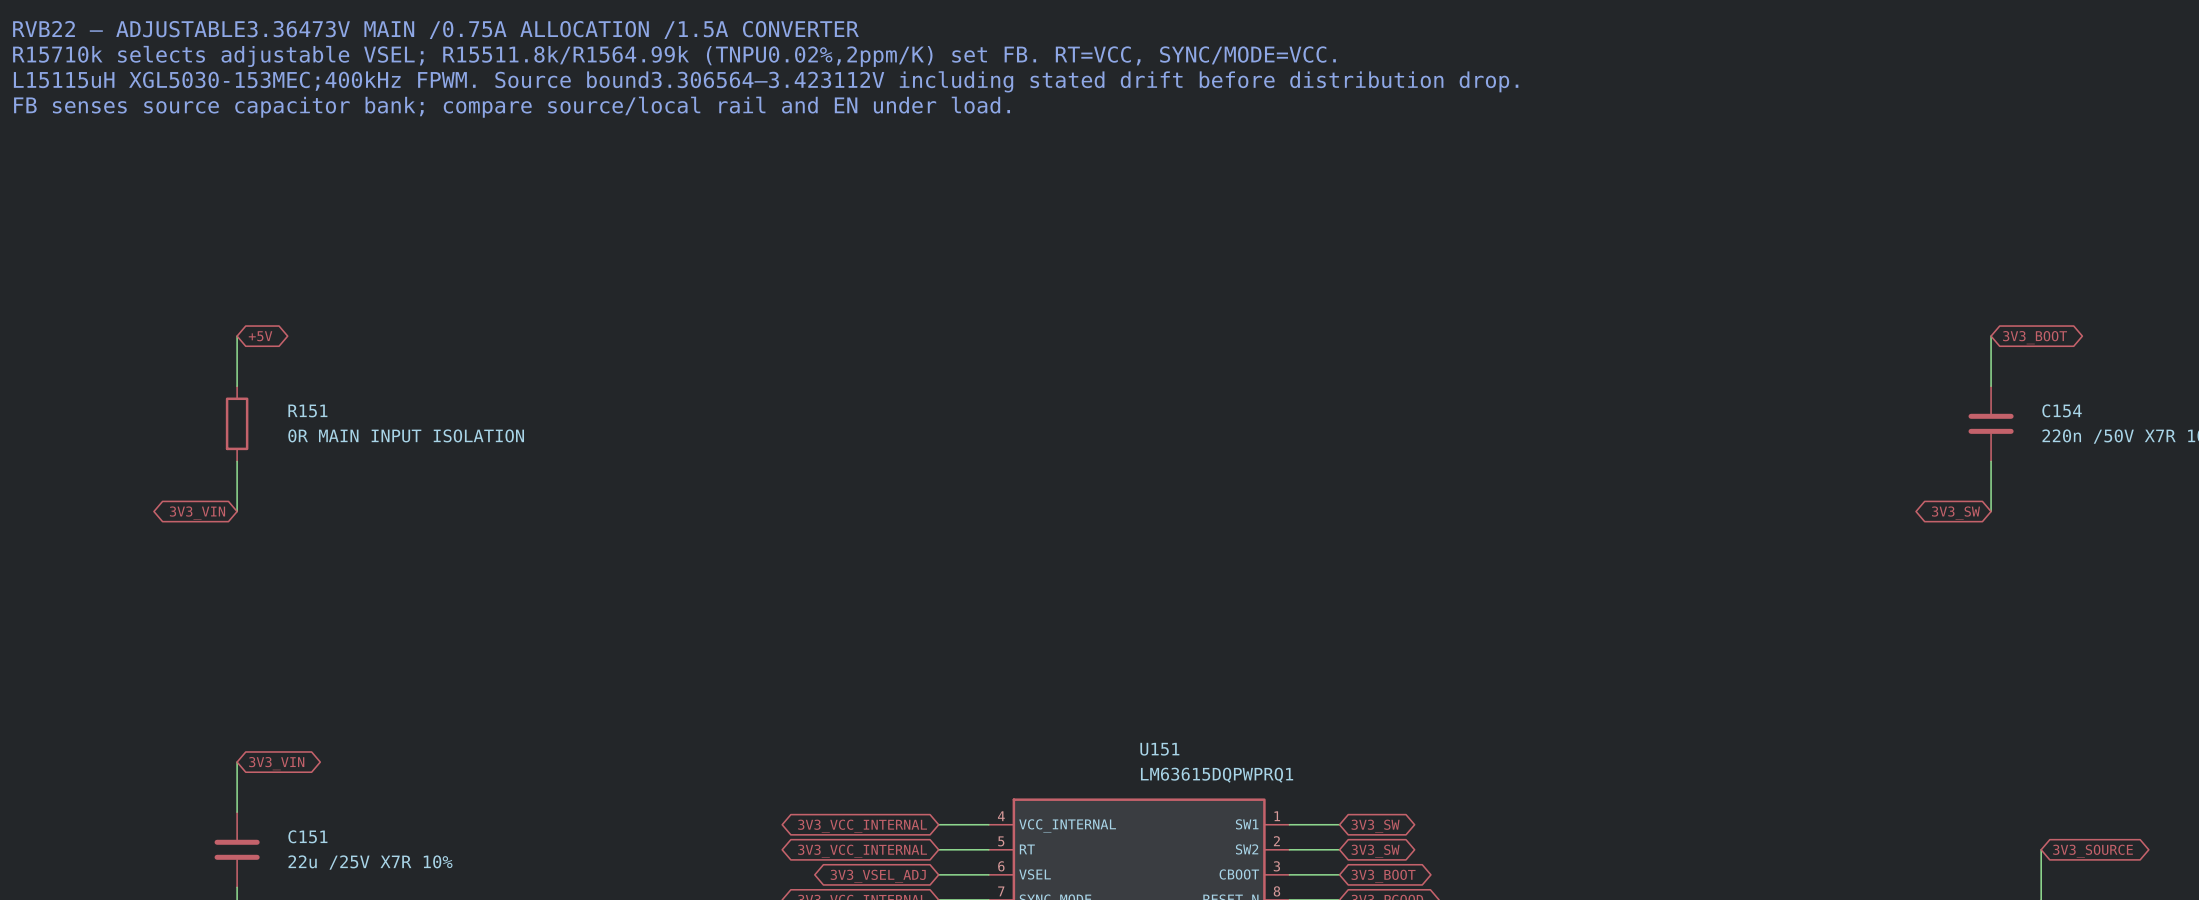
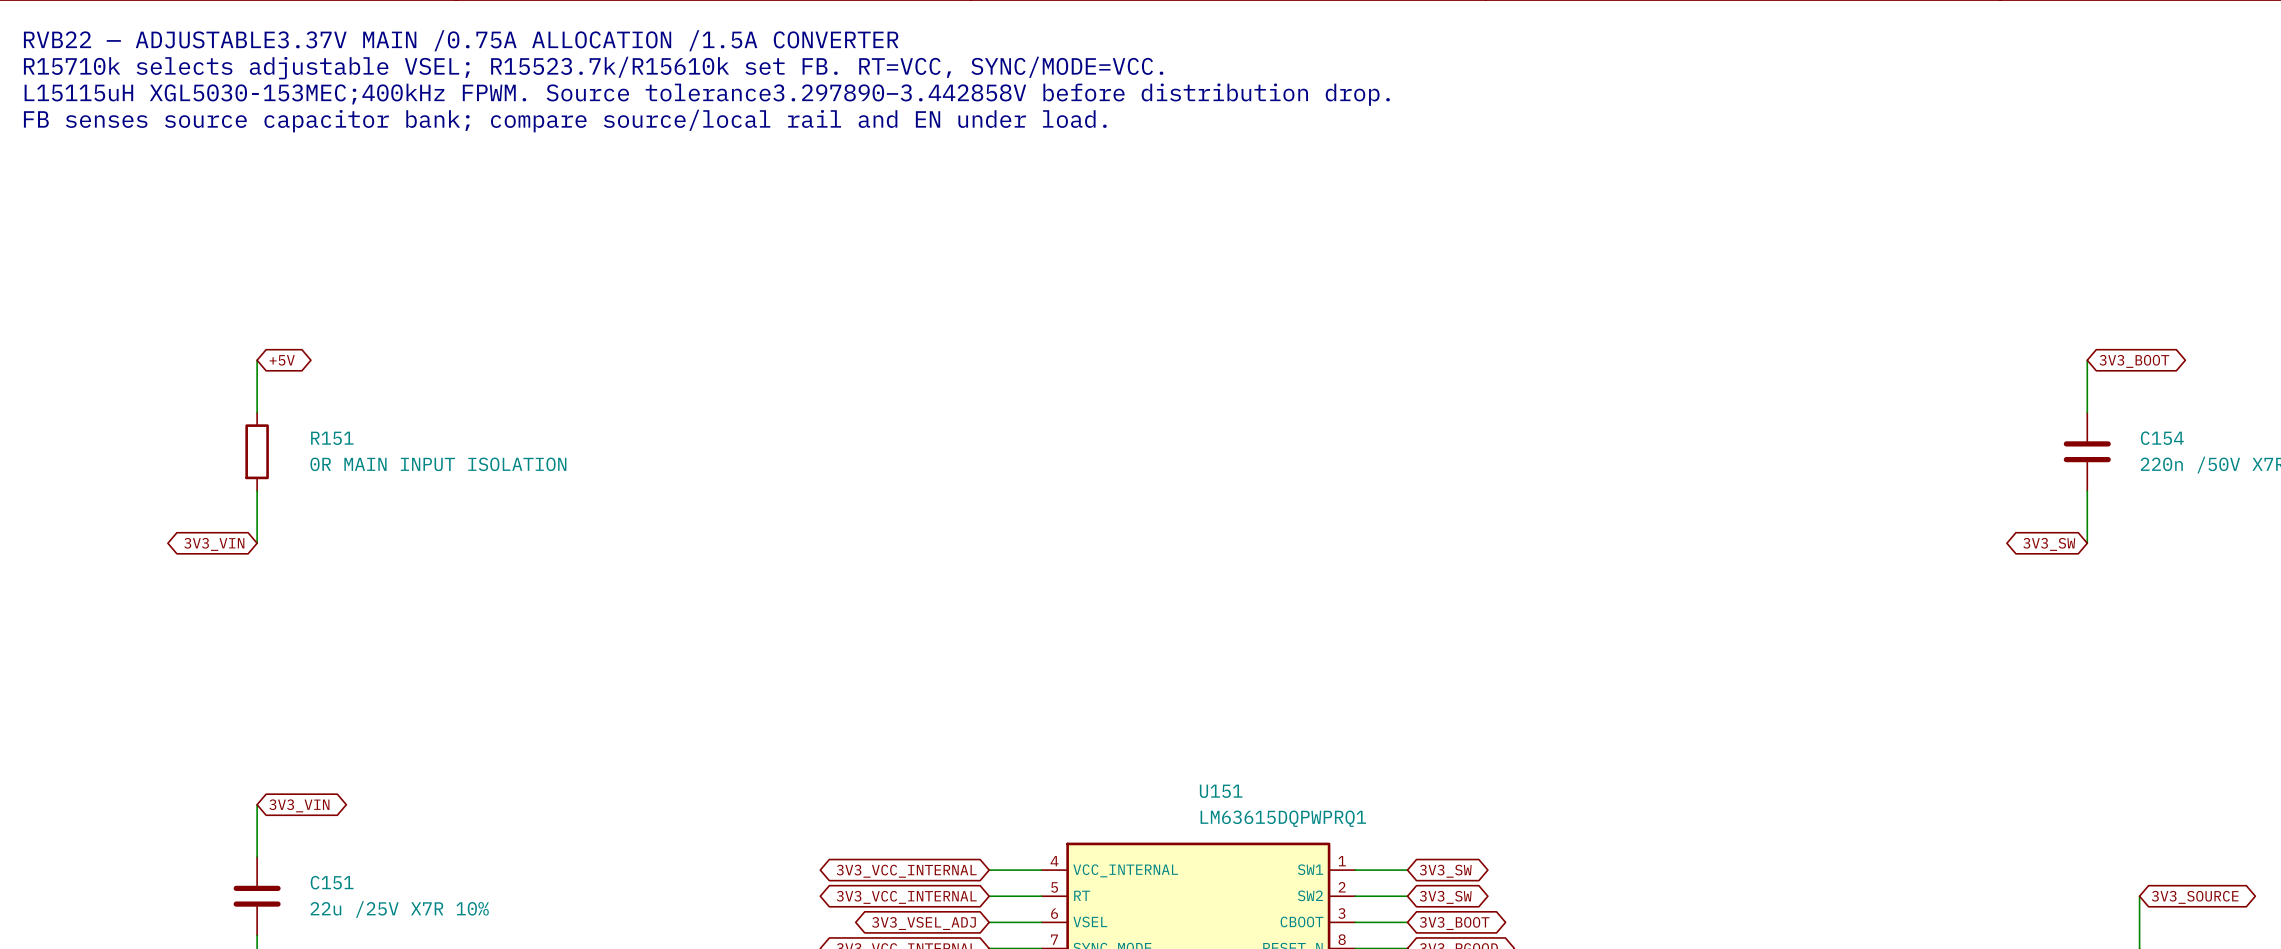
text: RVB22 — ADJUSTABLE3.36473V MAIN /0.75A ALLOCATION /1.5A CONVERTER (435, 29) -> RVB22 — ADJUSTABLE3.37V MAIN /0.75A ALLOCATION /1.5A CONVERTER (461, 40)
text: R15710k selects adjustable VSEL; R15511.8k/R1564.99k (TNPU0.02%,2ppm/K) set FB. RT=VCC, SYNC/MODE=VCC. (674, 56) -> R15710k selects adjustable VSEL; R15523.7k/R15610k set FB. RT=VCC, SYNC/MODE=VCC. (593, 68)
text: L15115uH XGL5030-153MEC;400kHz FPWM. Source bound3.306564–3.423112V including stated drift before distribution drop. (766, 81) -> L15115uH XGL5030-153MEC;400kHz FPWM. Source tolerance3.297890–3.442858V before distribution drop. (707, 94)

